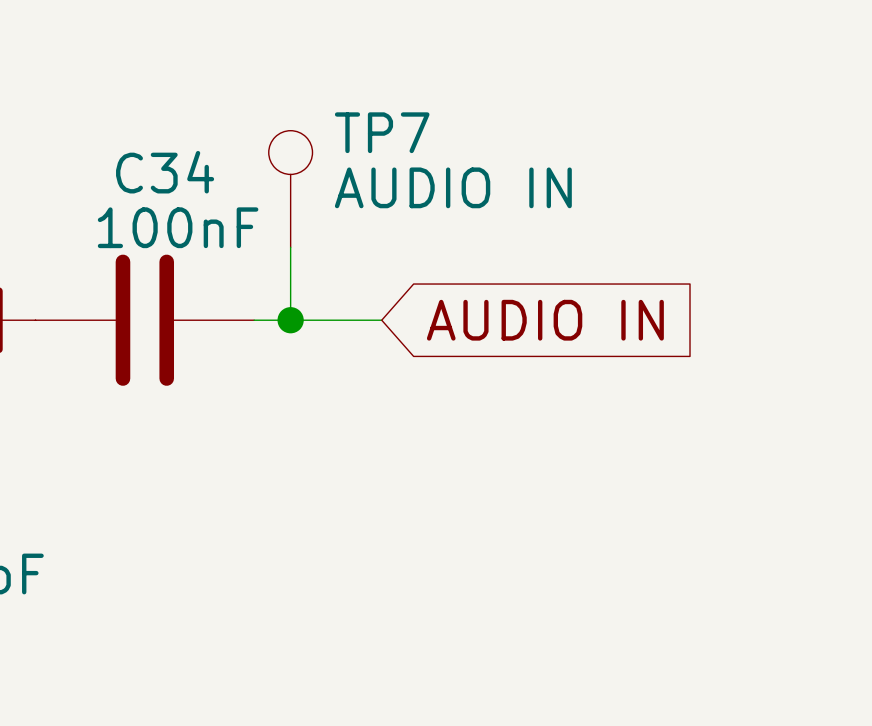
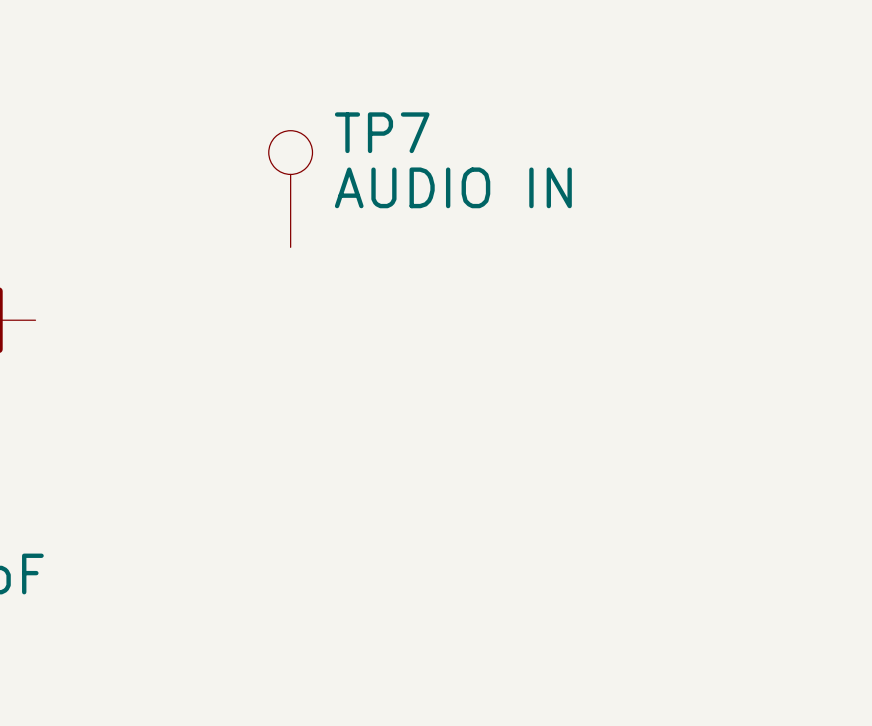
wire: (290, 247) (290, 320) -> none
C34: 100nF (144, 320) -> none
wire: (254, 320) (381, 320) -> none
junction: (290, 320) -> none
global label: AUDIO IN (545, 320) -> none

